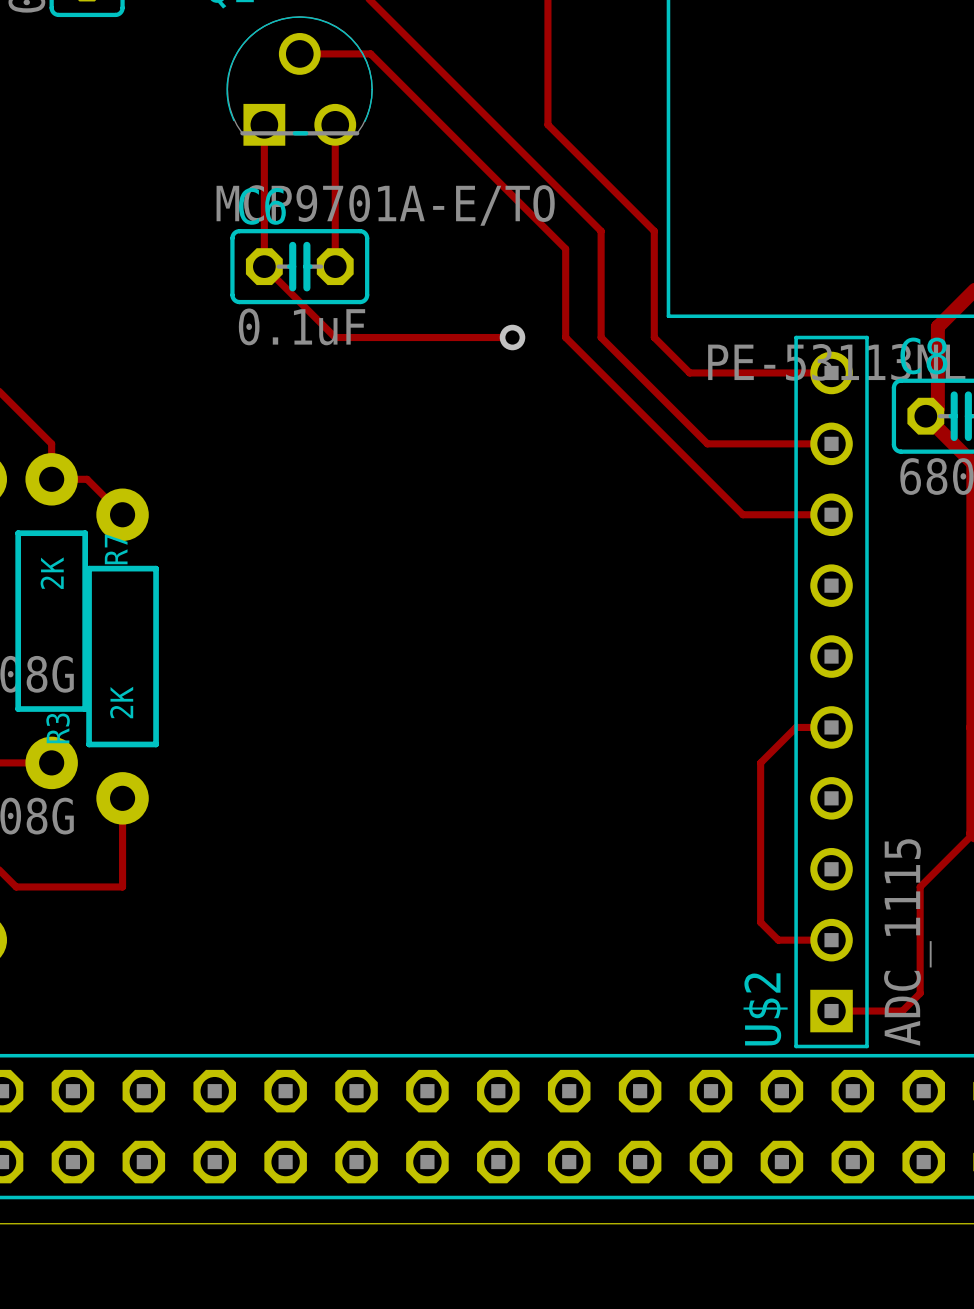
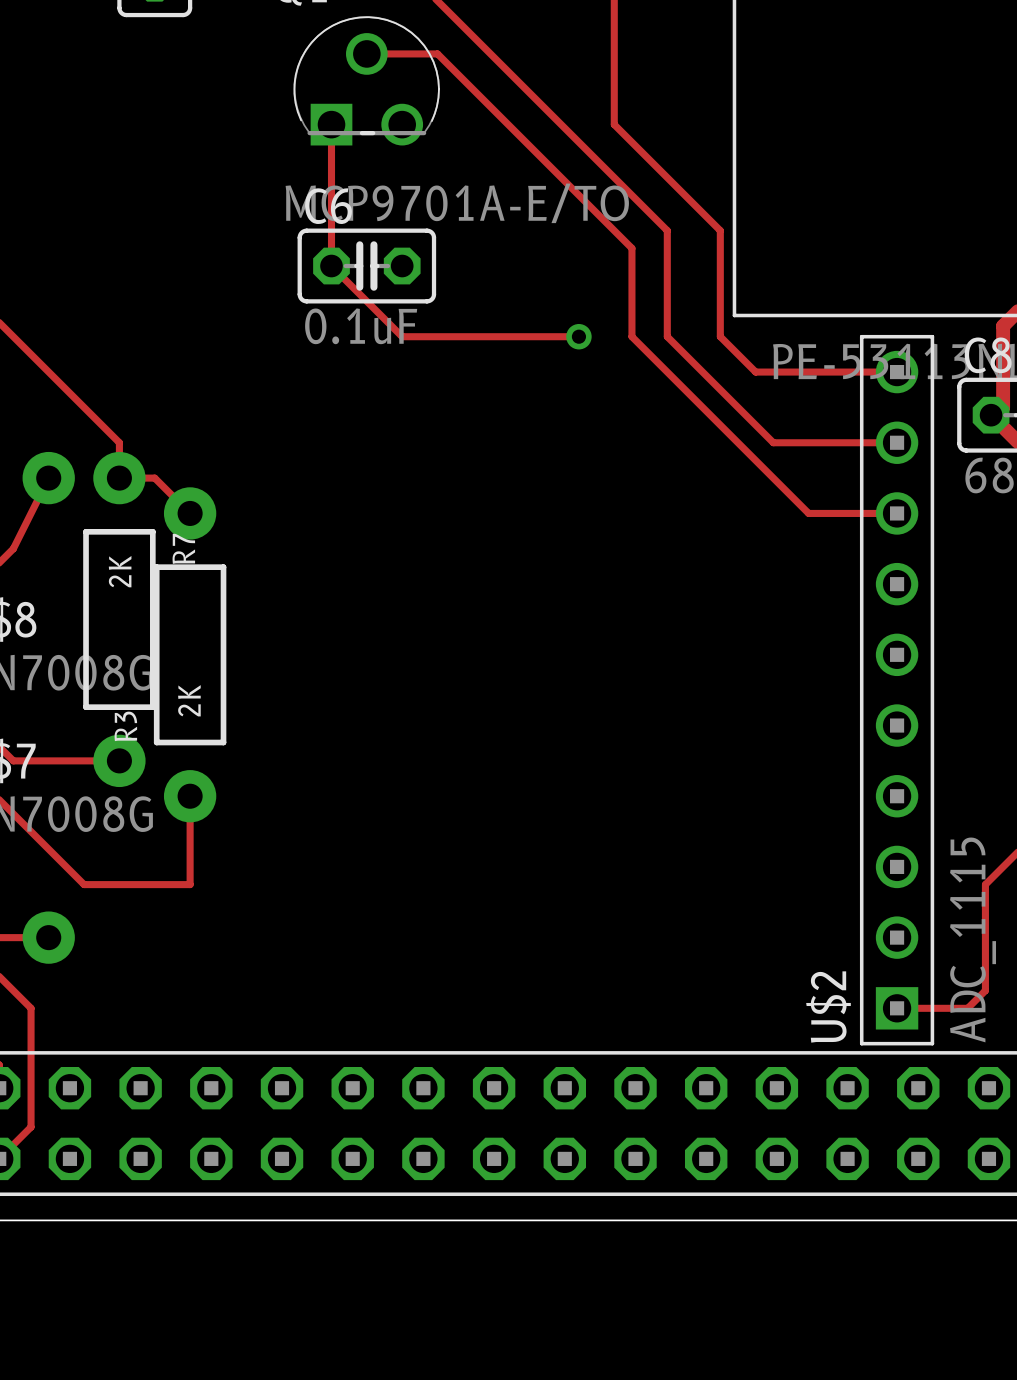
track: (335, 124) (335, 266) -> none
track: (831, 727) (796, 727) (760, 762) (760, 922) (778, 940) (831, 940) -> none

